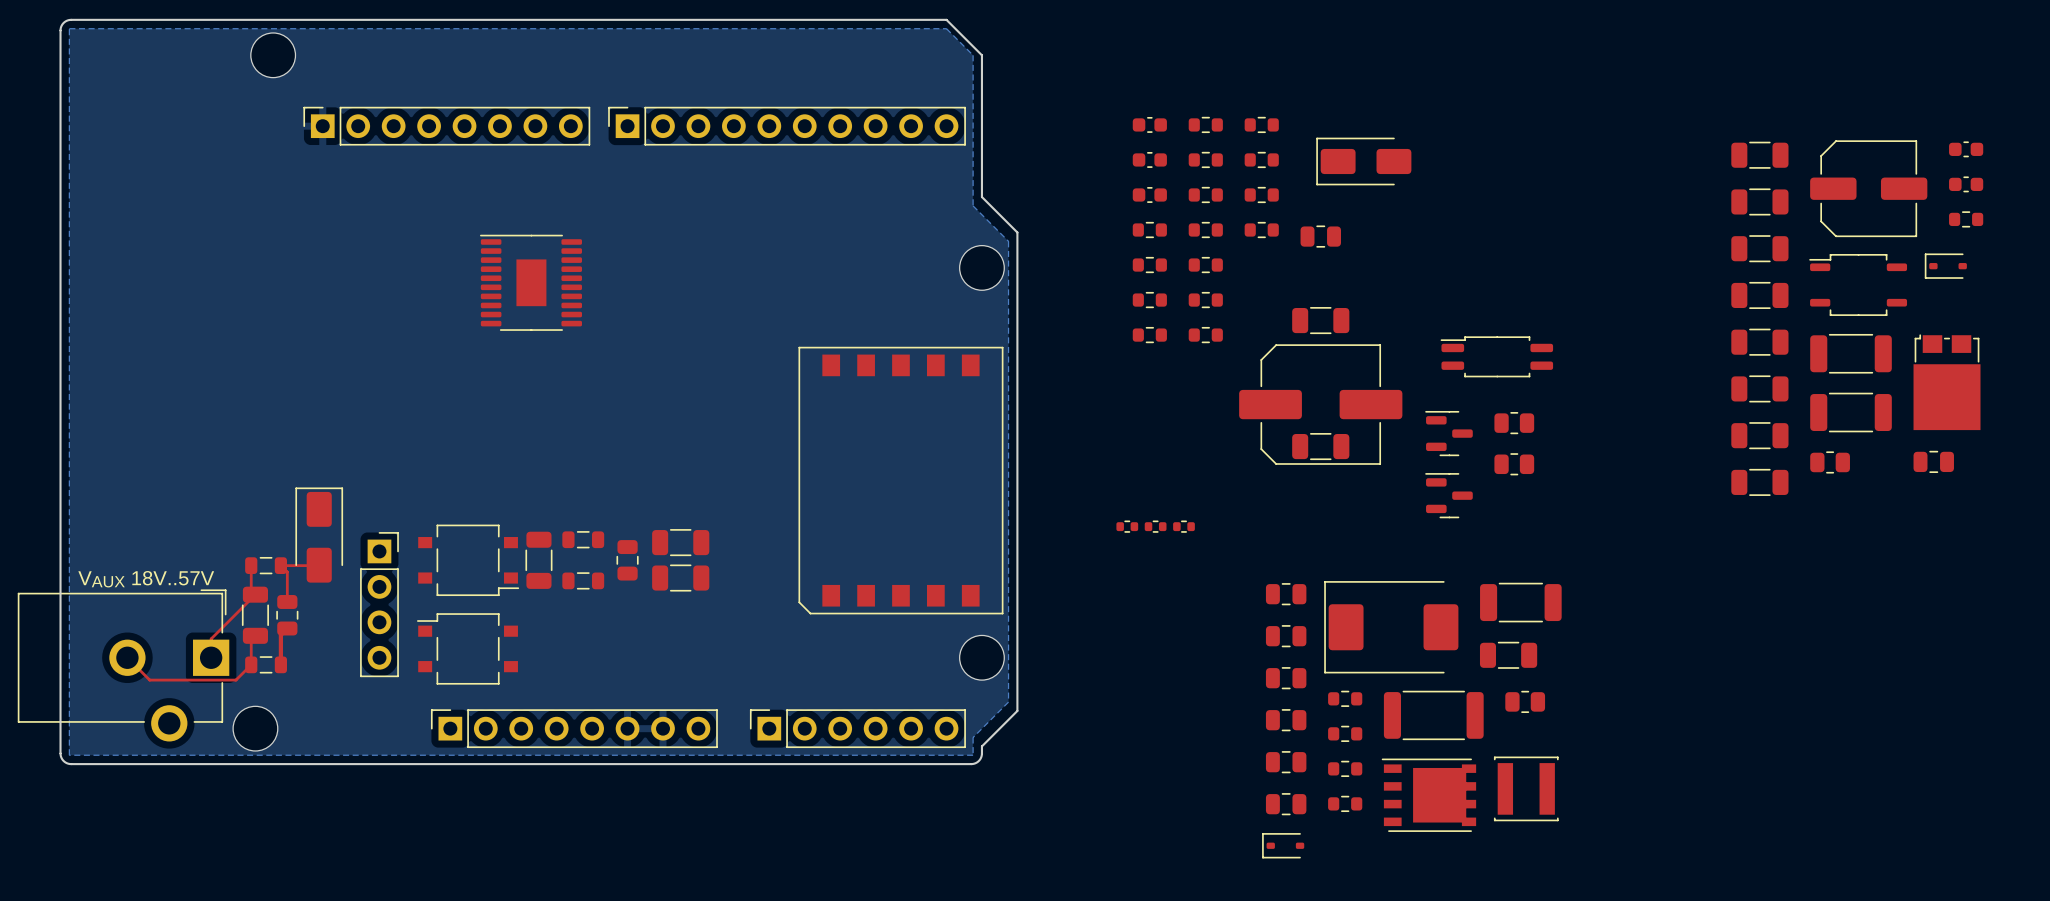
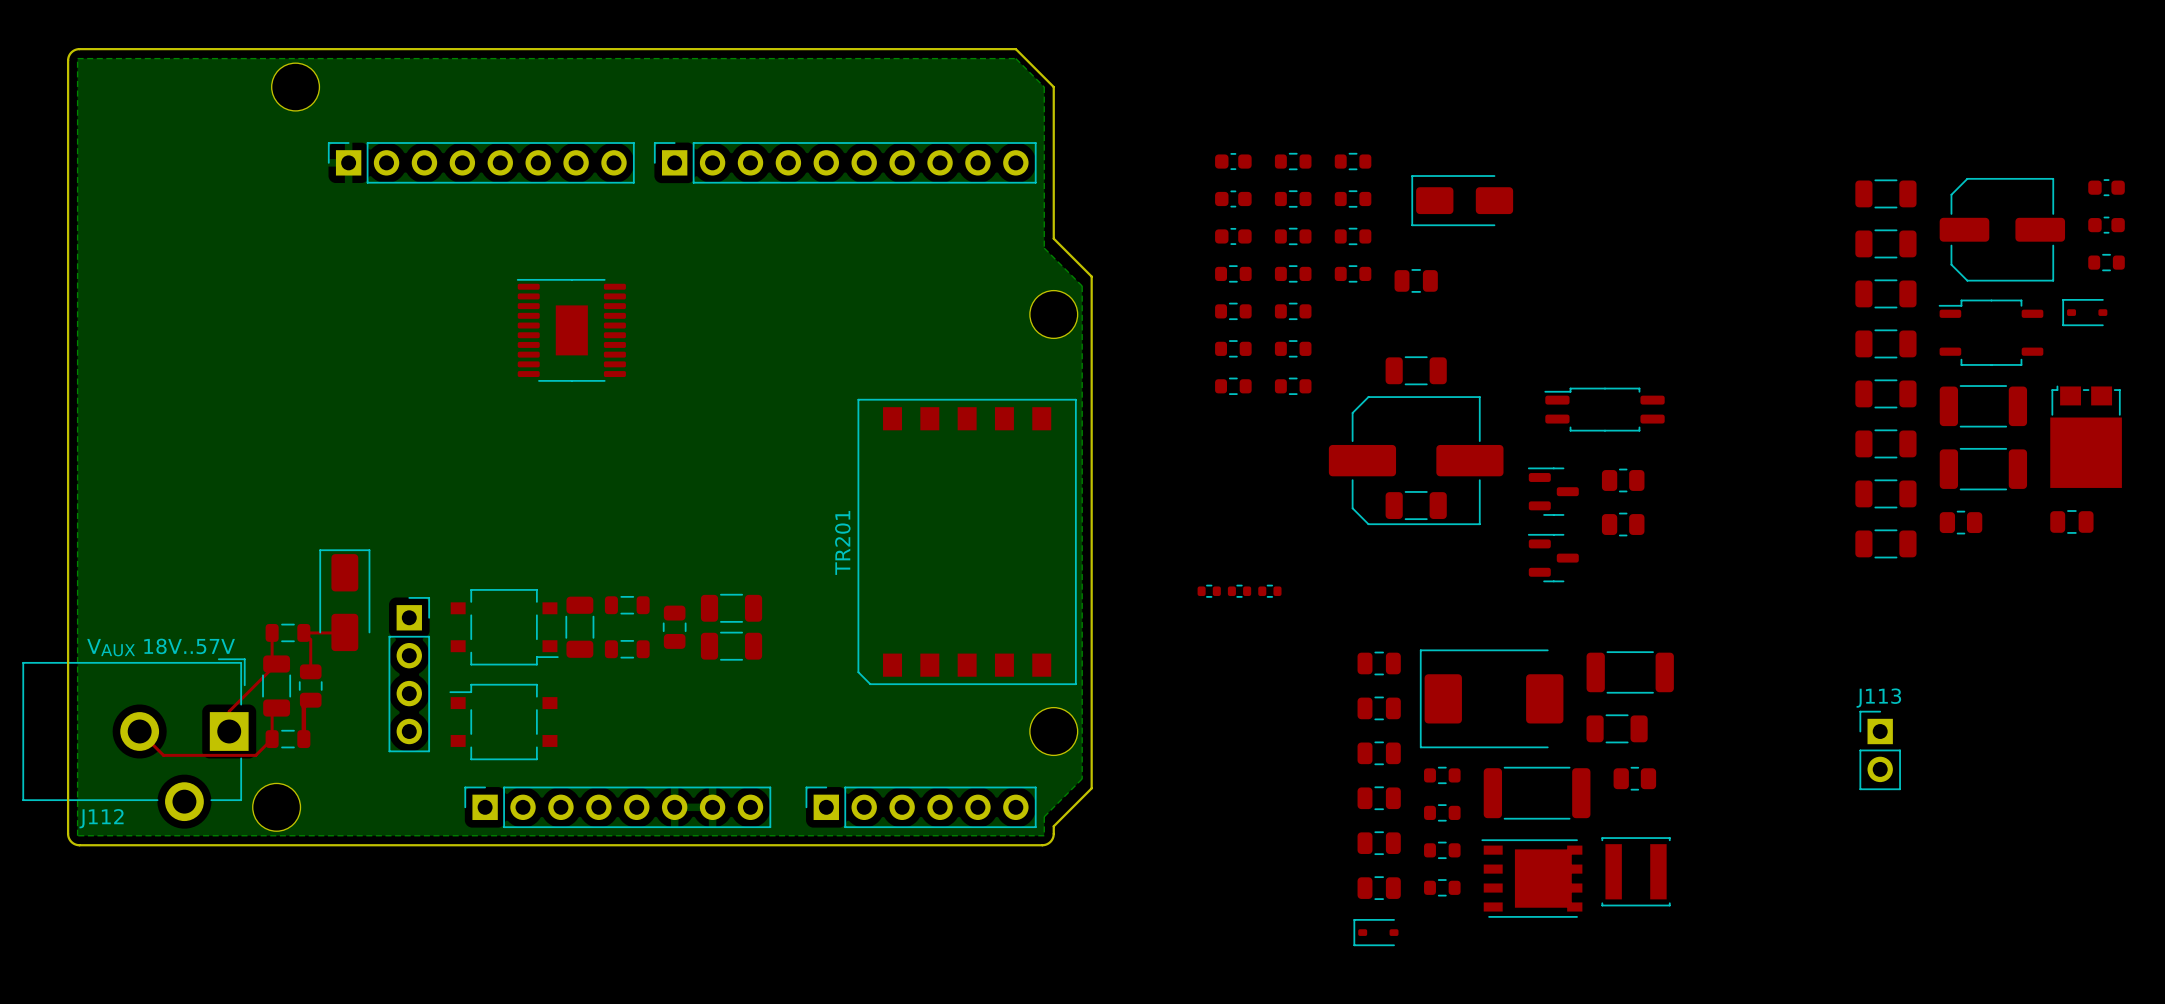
TR201 name: none -> TR201 (842, 542)
J113: none -> (1880, 750)
J112 name: none -> J112 (101, 818)

